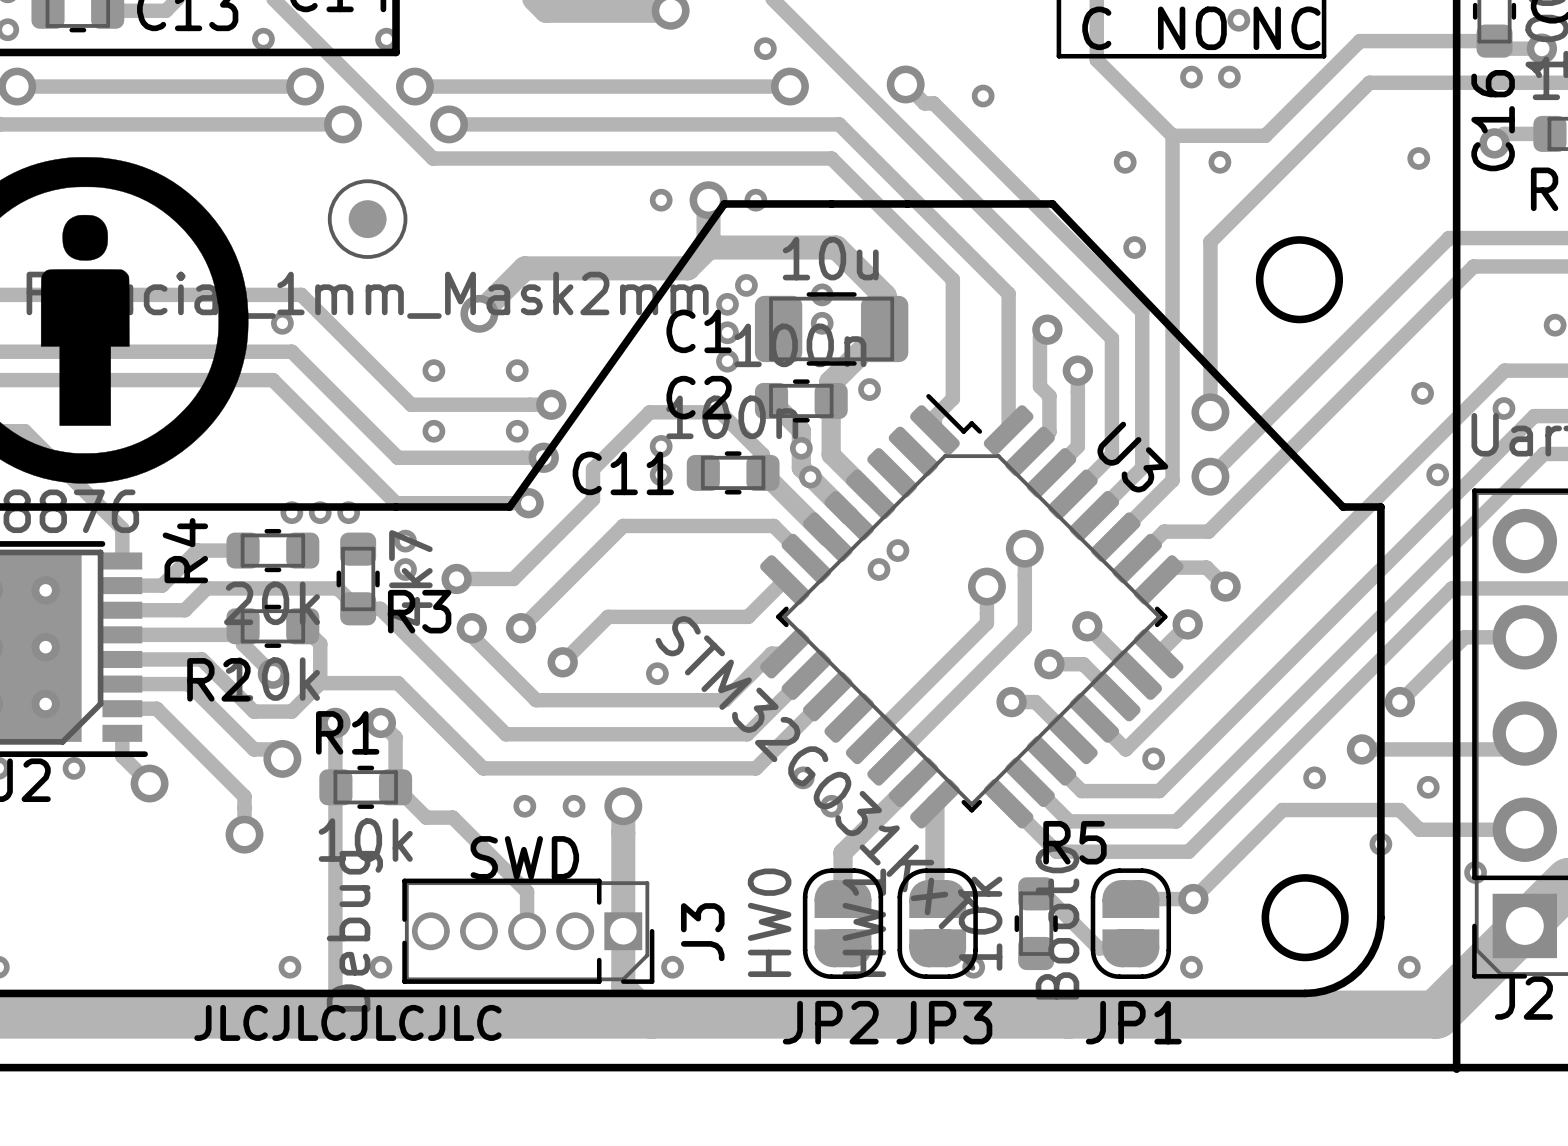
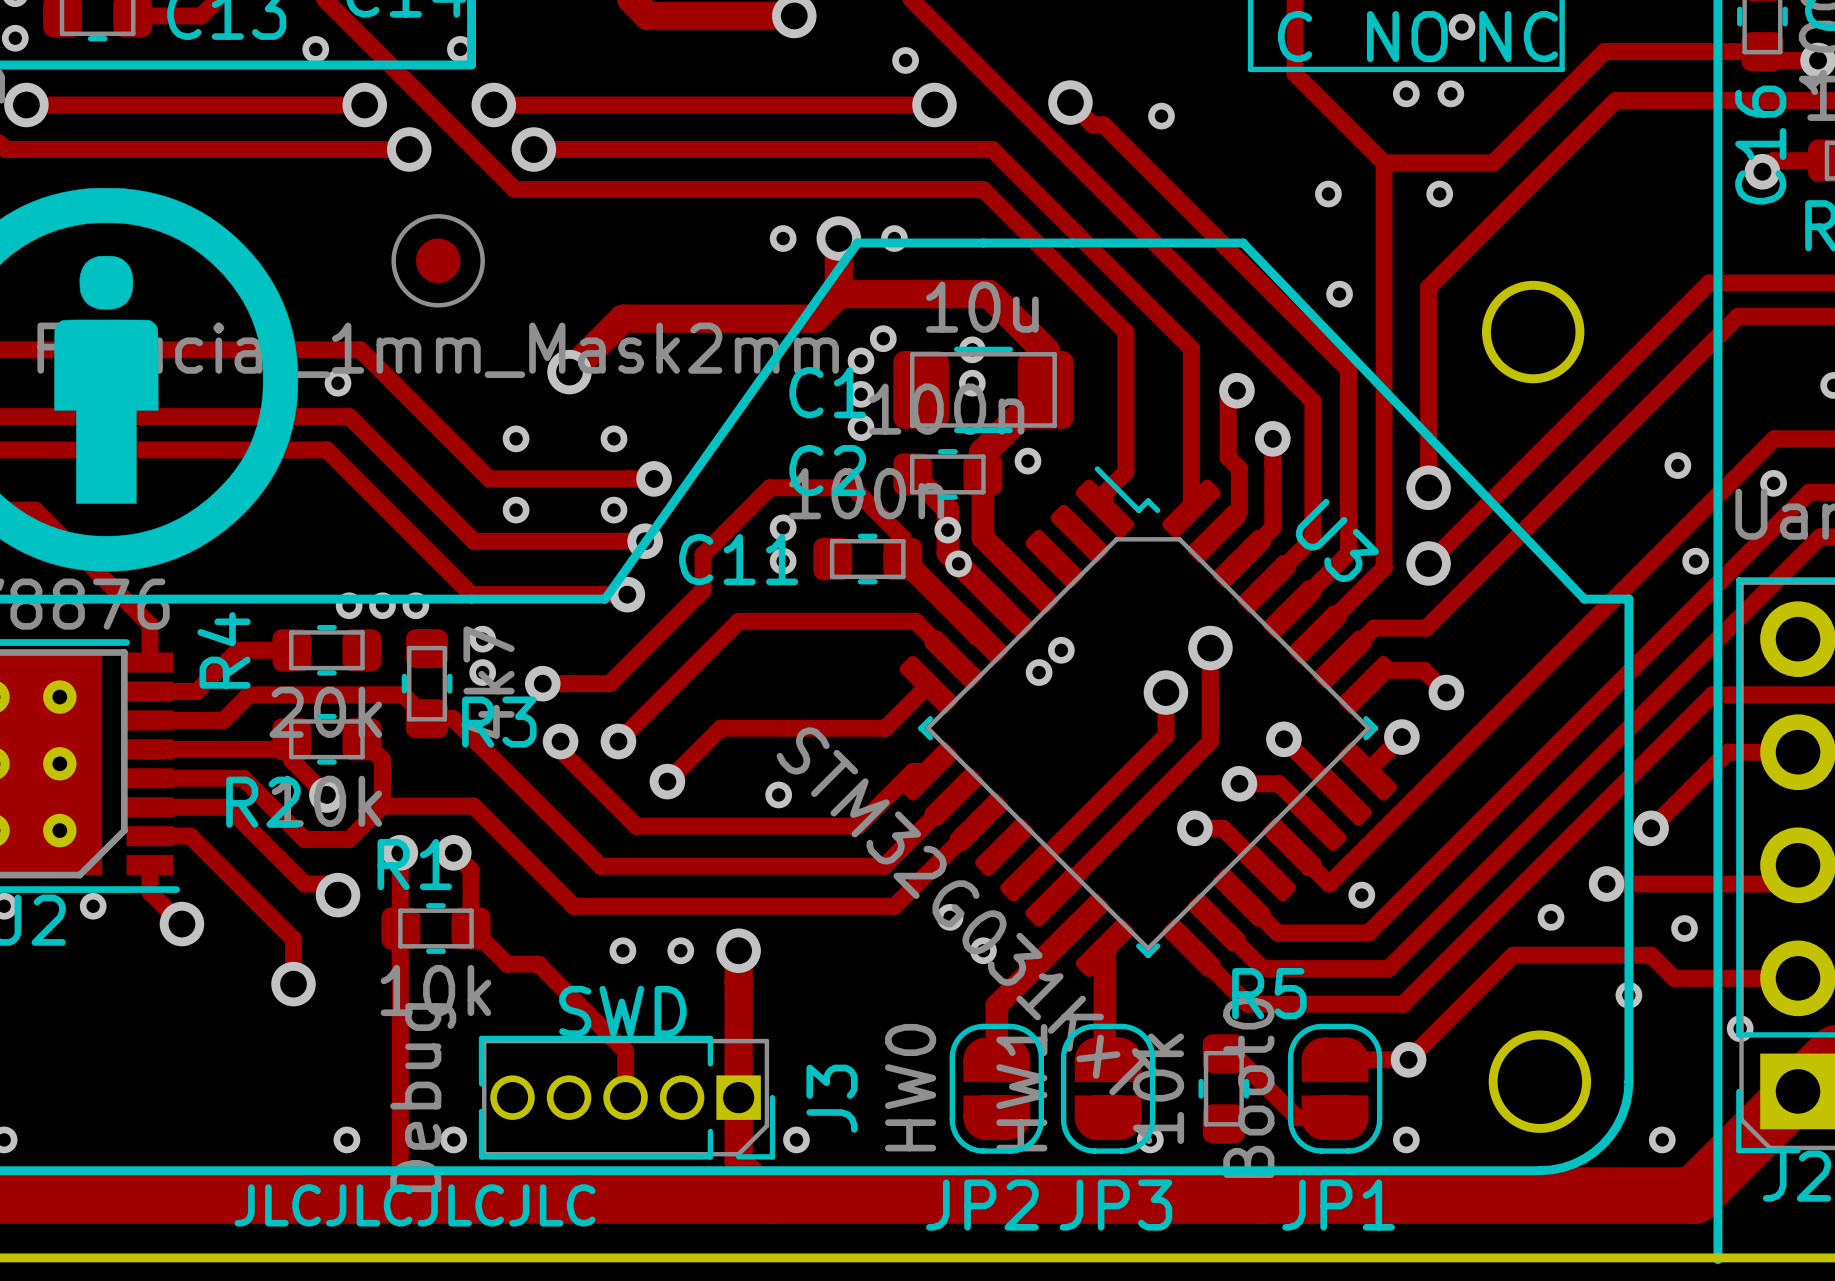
via: (1418, 158) -> none

